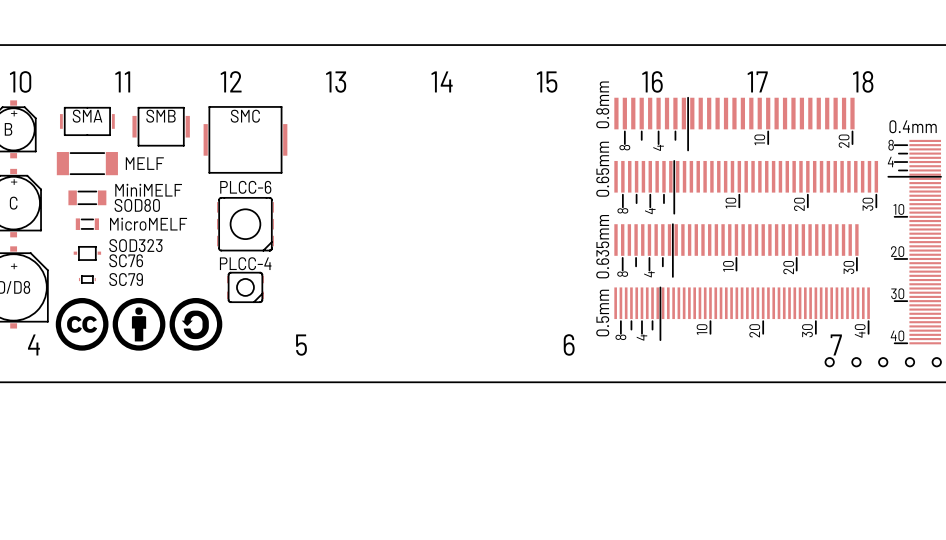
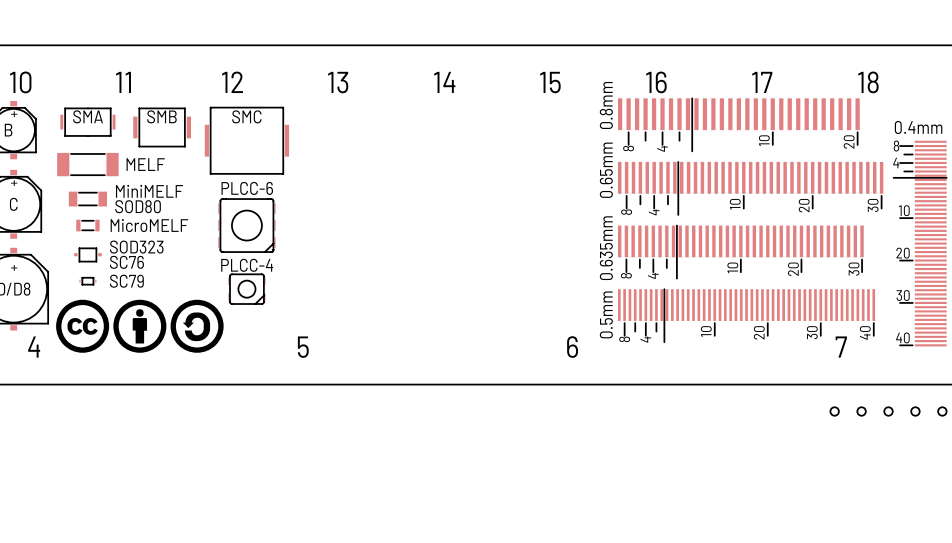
hole: (829, 362) -> none
hole: (856, 362) -> none
hole: (883, 362) -> none
hole: (909, 362) -> none
hole: (936, 362) -> none
hole: none -> (834, 411)
hole: none -> (861, 411)
hole: none -> (888, 411)
hole: none -> (915, 411)
hole: none -> (942, 411)

